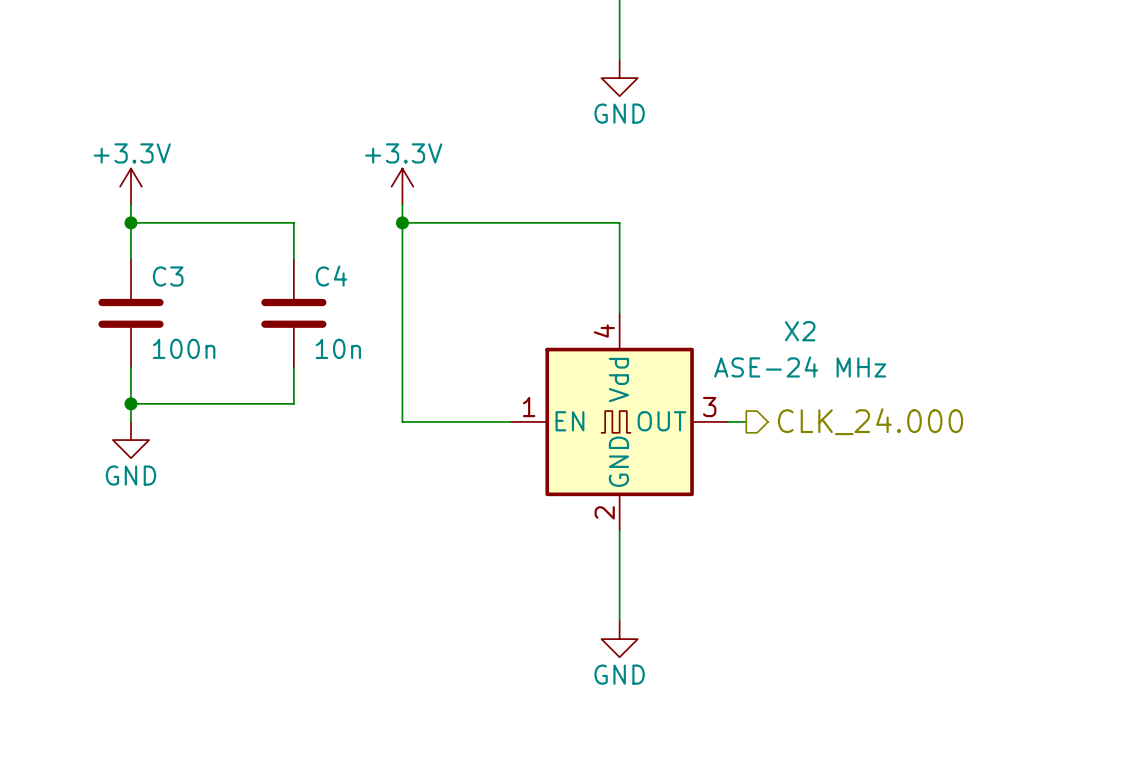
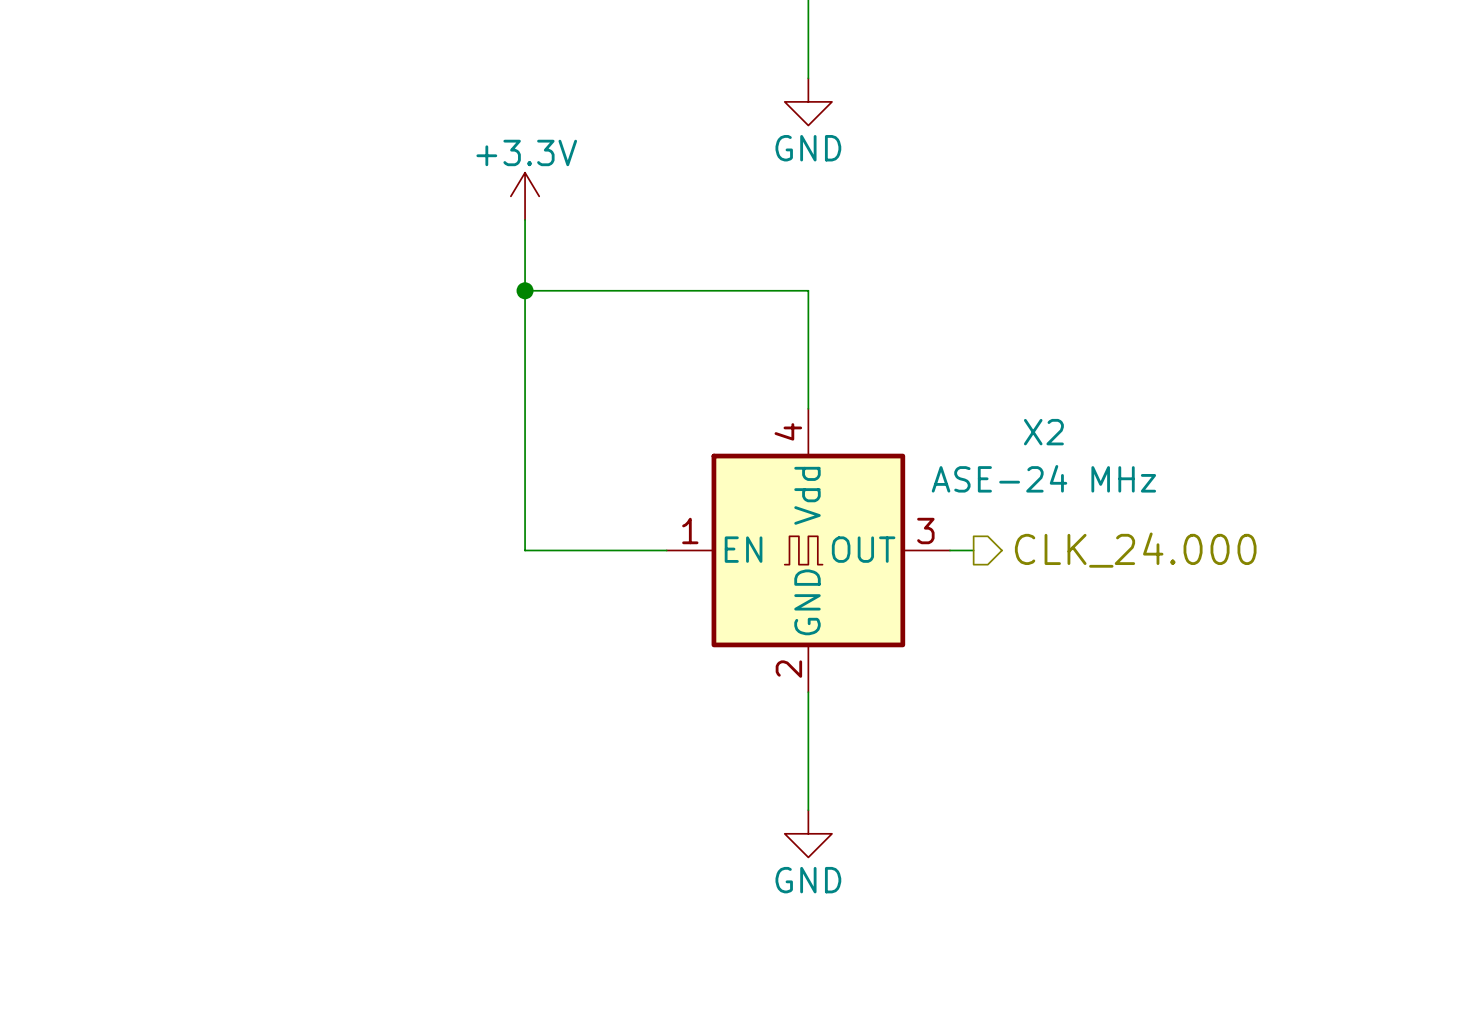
power symbol: +3.3V (130, 186) -> none
power symbol position: +3.3V (402, 186) -> +3.3V (525, 196)
wire: (130, 204) (130, 259) -> none
wire: (130, 222) (293, 222) (293, 259) -> none
junction: (130, 222) -> none
C3: 100n (130, 313) -> none
C4: 10n (293, 313) -> none
wire: (130, 367) (130, 421) -> none
wire: (293, 367) (293, 403) (130, 403) -> none
junction: (130, 403) -> none
power symbol: GND (130, 440) -> none

